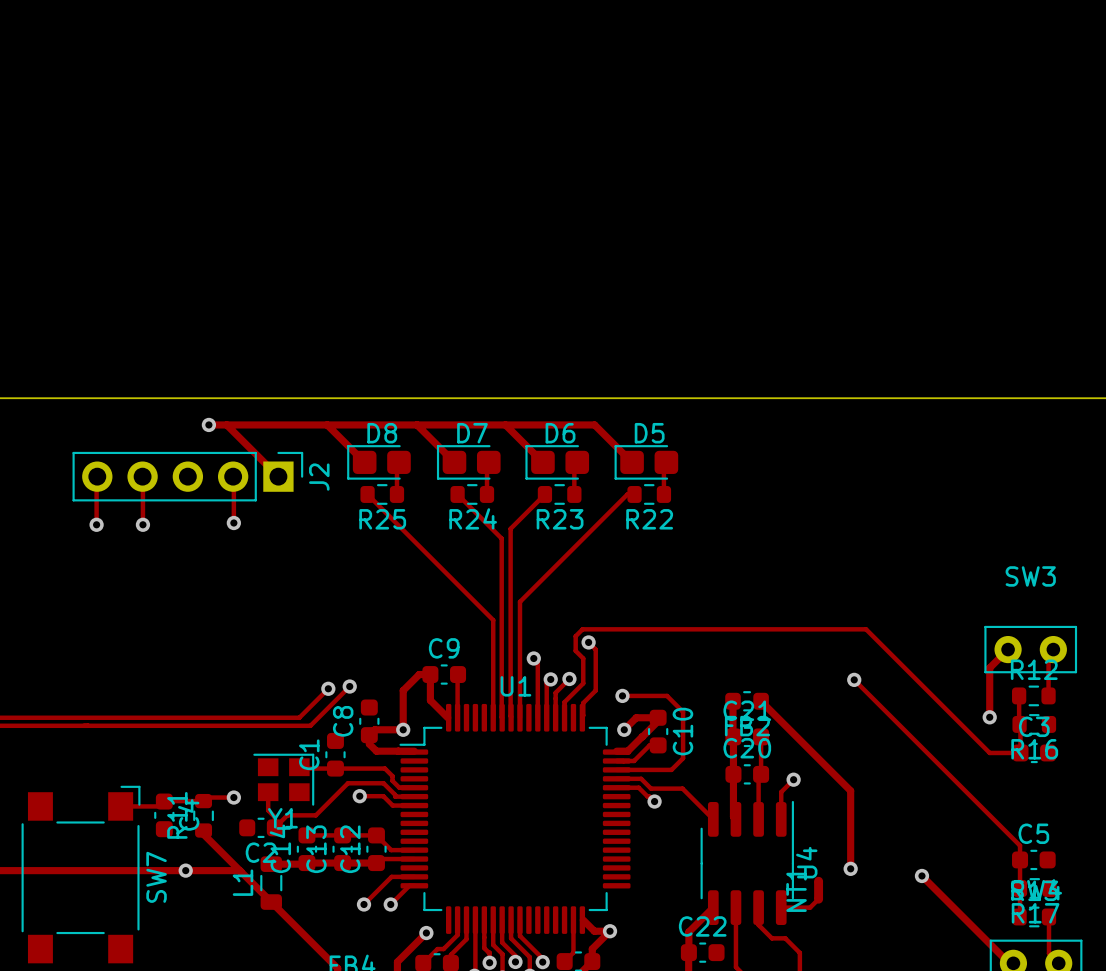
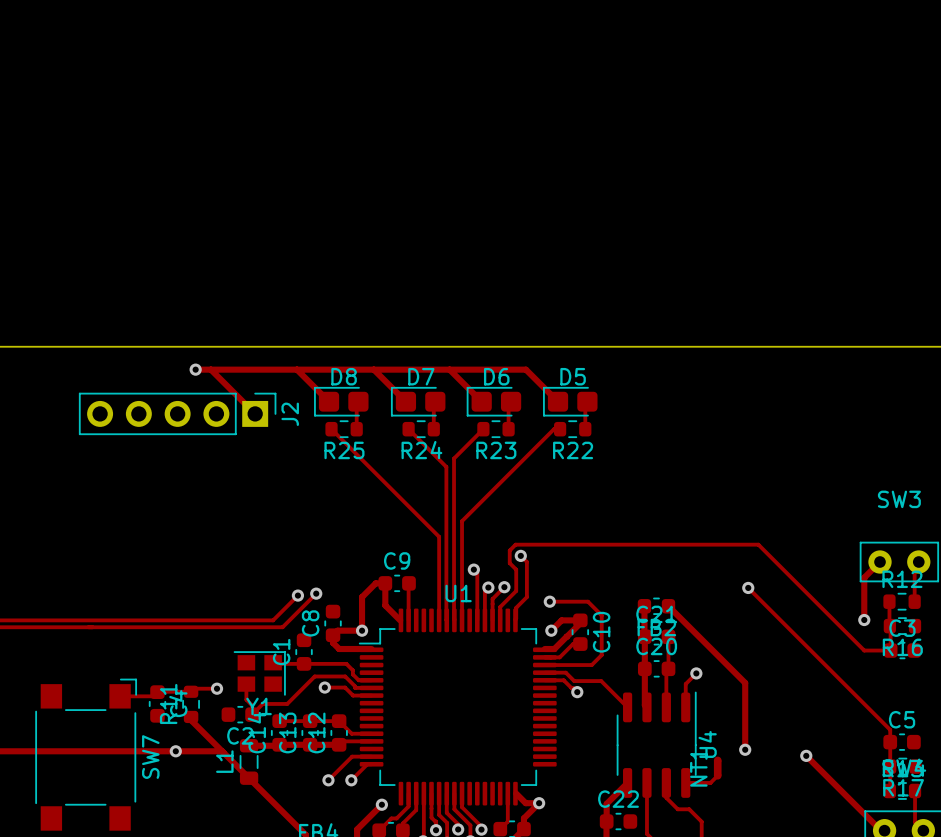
track: (96, 477) (96, 524) -> none
track: (142, 477) (142, 524) -> none
track: (233, 477) (233, 523) -> none
via: (233, 523) -> none
via: (96, 524) -> none
via: (142, 524) -> none

